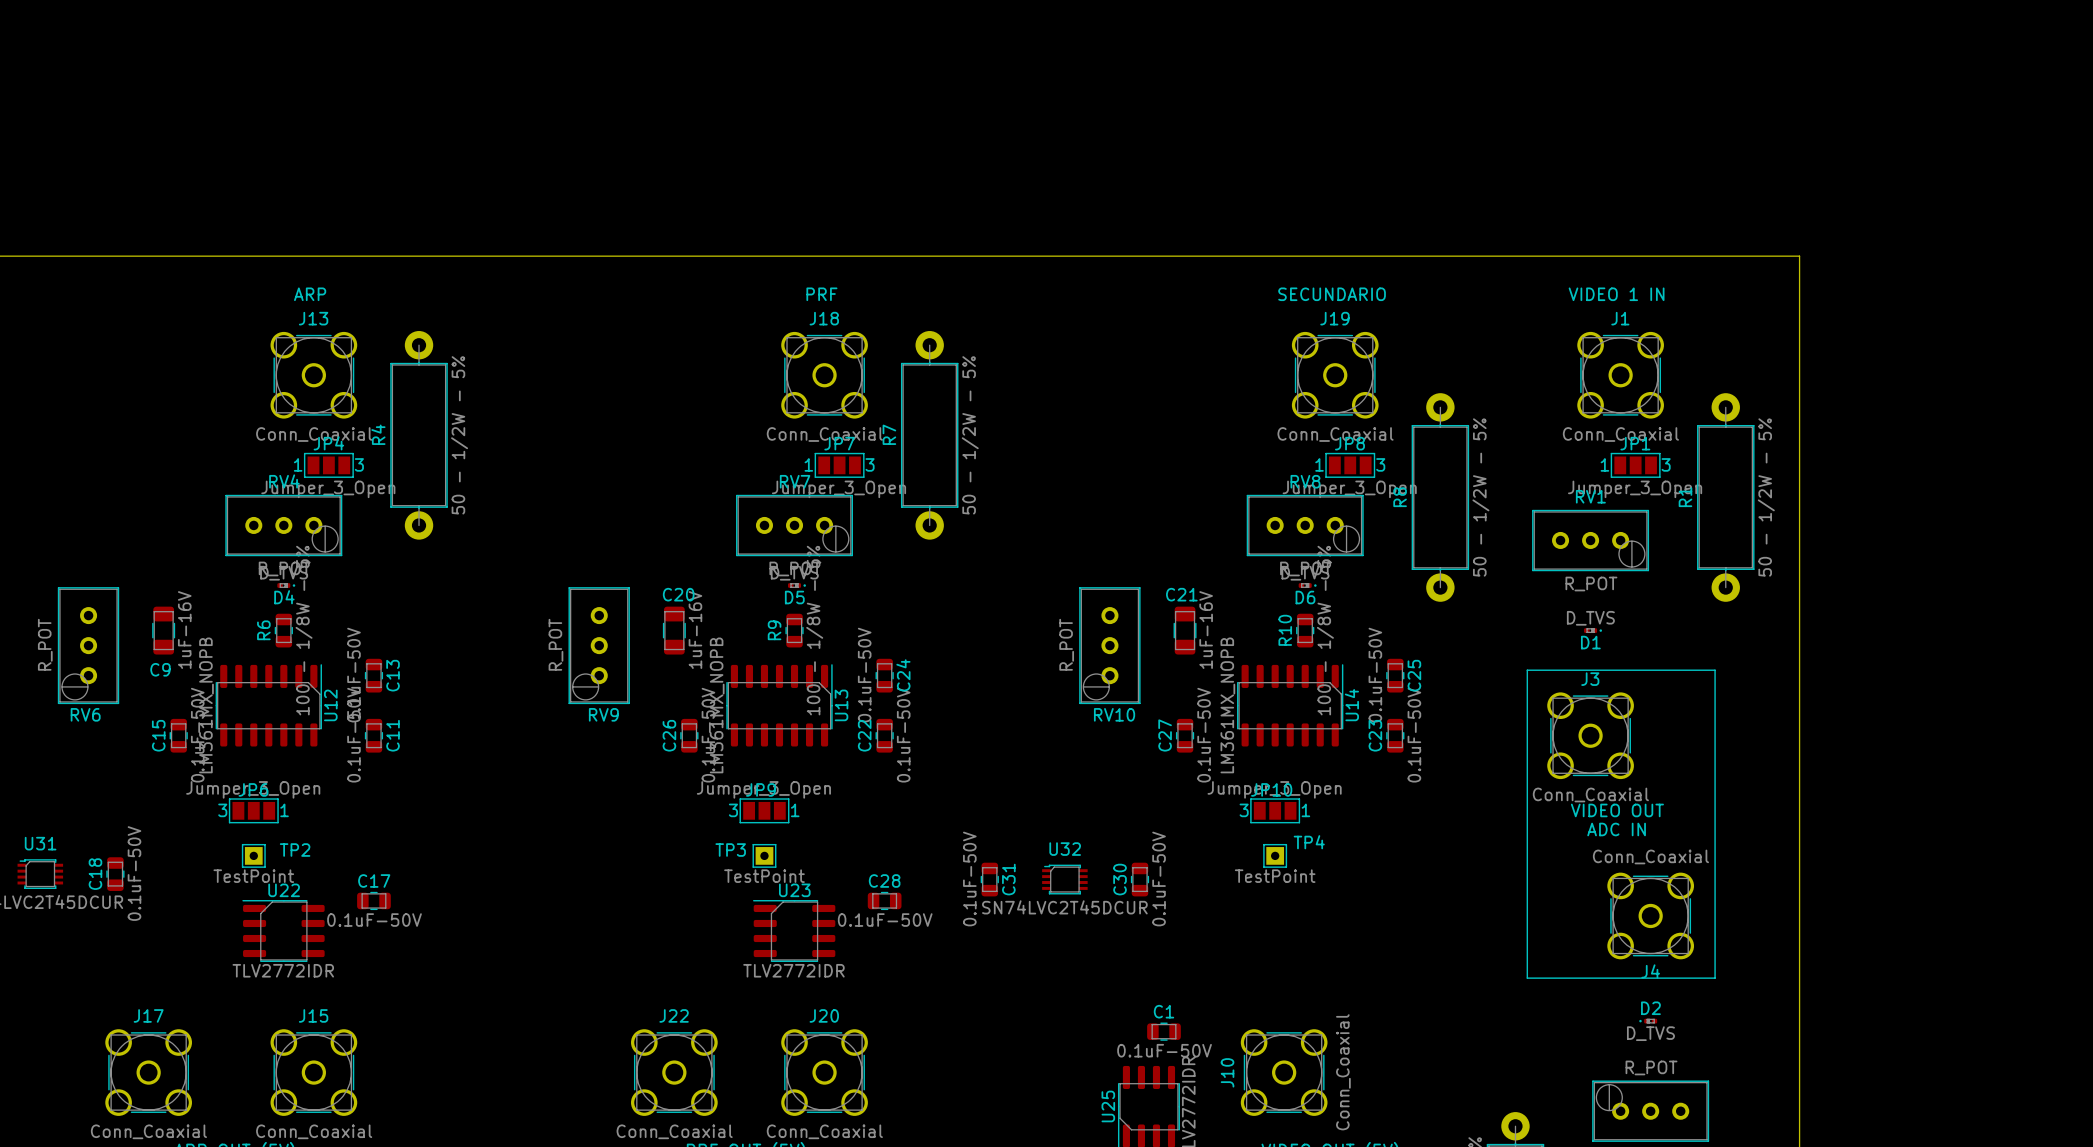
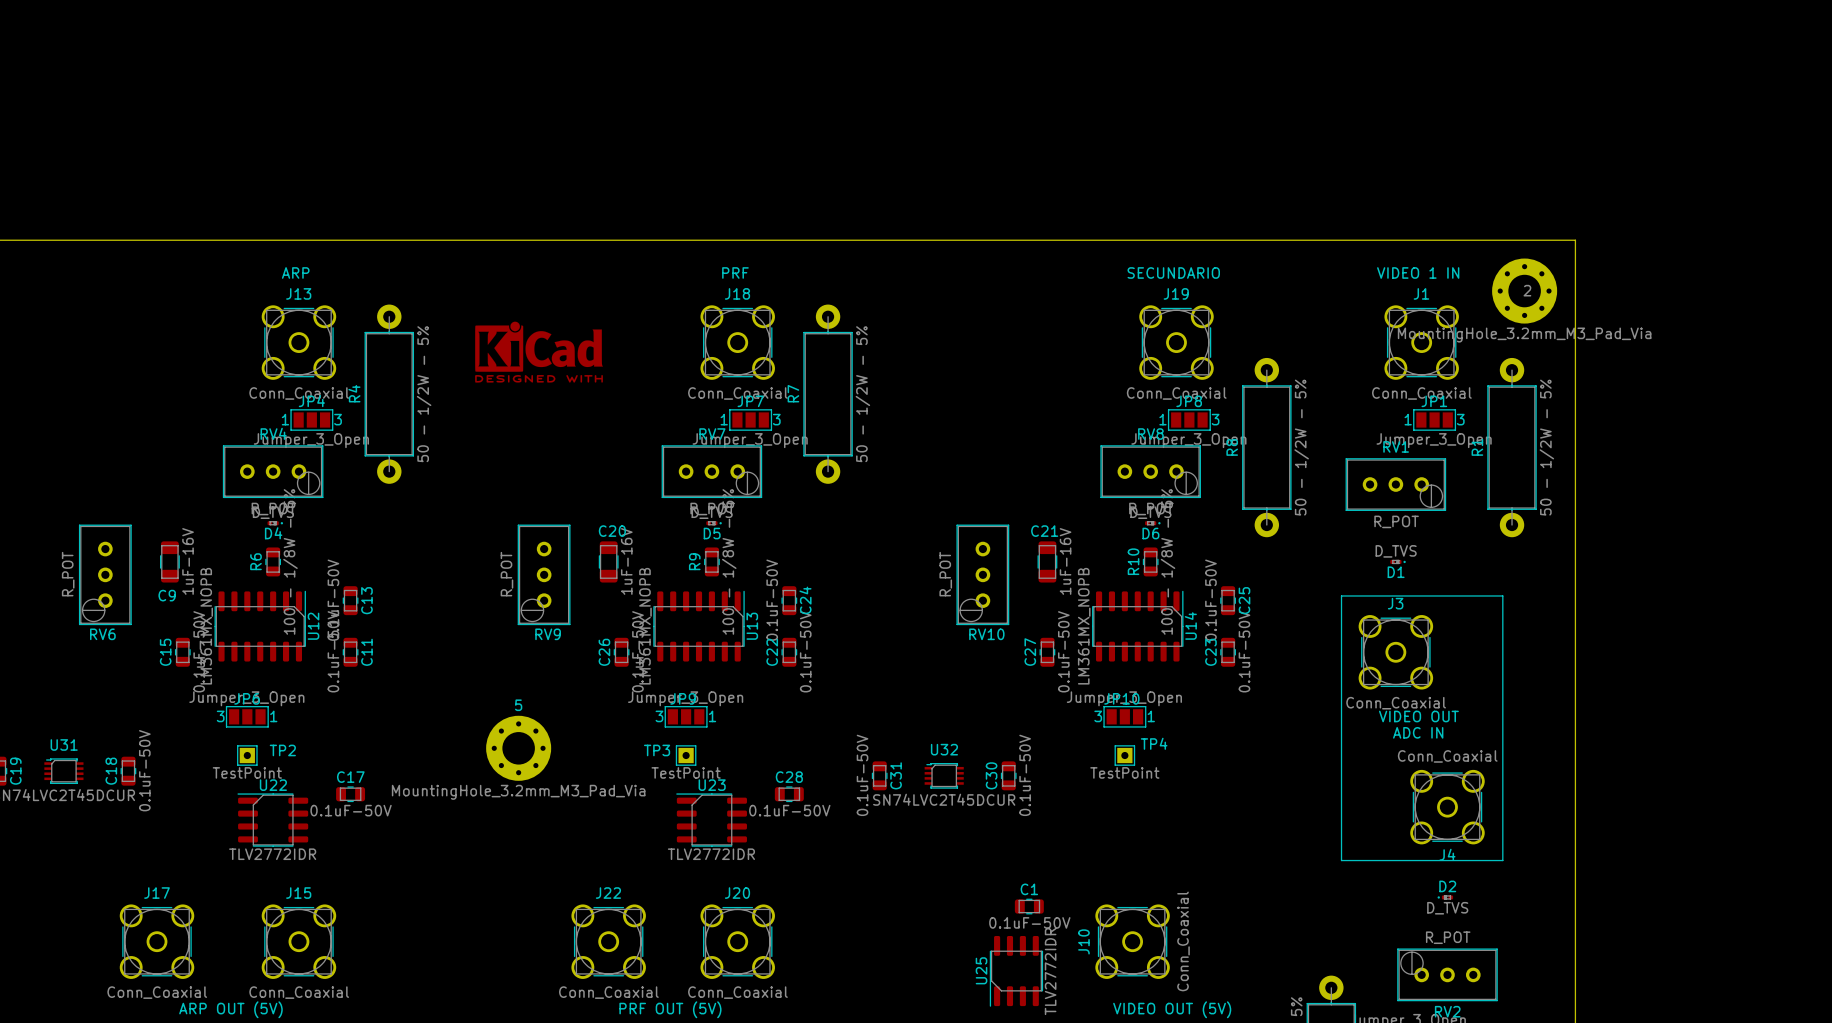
2: none -> MountingHole_3.2mm_M3_Pad_Via (1524, 291)
drawing: none -> [475, 321, 603, 383]
5: none -> MountingHole_3.2mm_M3_Pad_Via (518, 748)

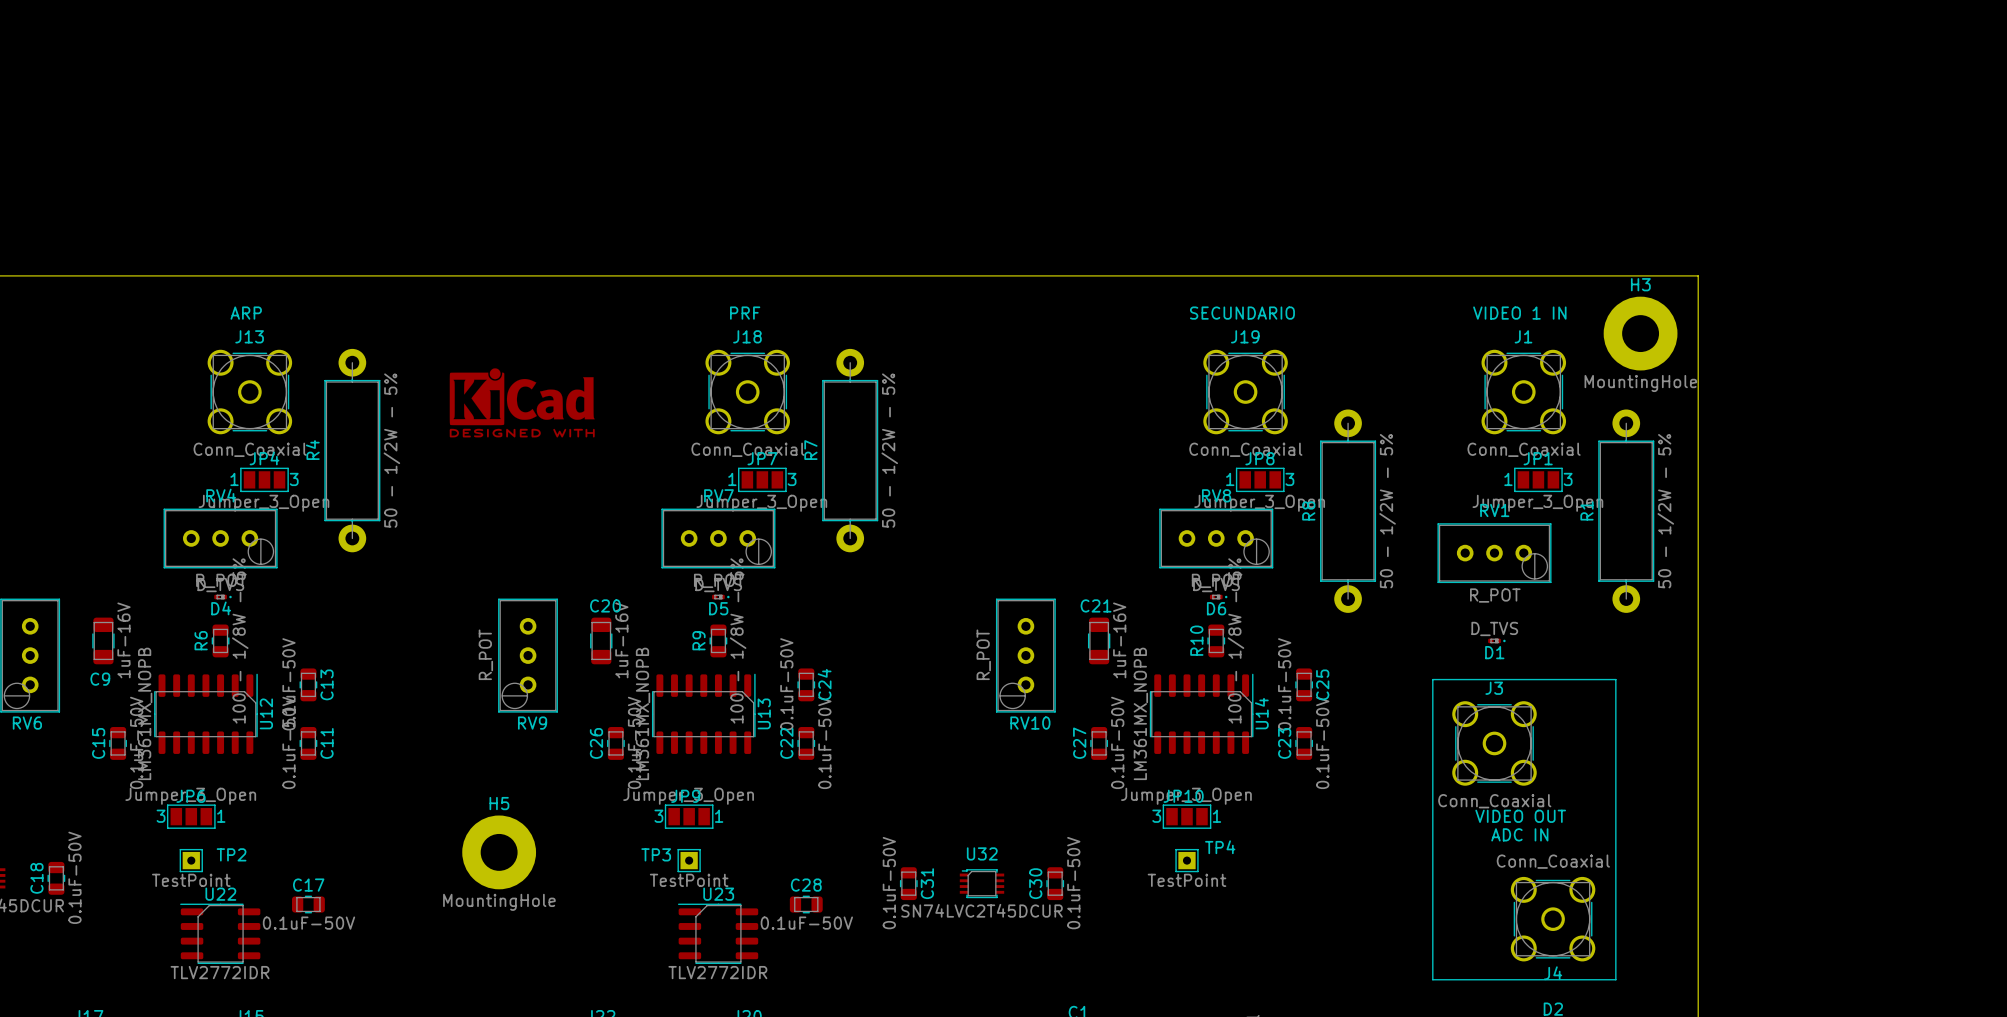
2: MountingHole_3.2mm_M3_Pad_Via (1524, 291) -> none
H3: none -> MountingHole (1640, 333)
5: MountingHole_3.2mm_M3_Pad_Via (518, 748) -> none
H5: none -> MountingHole (499, 852)

